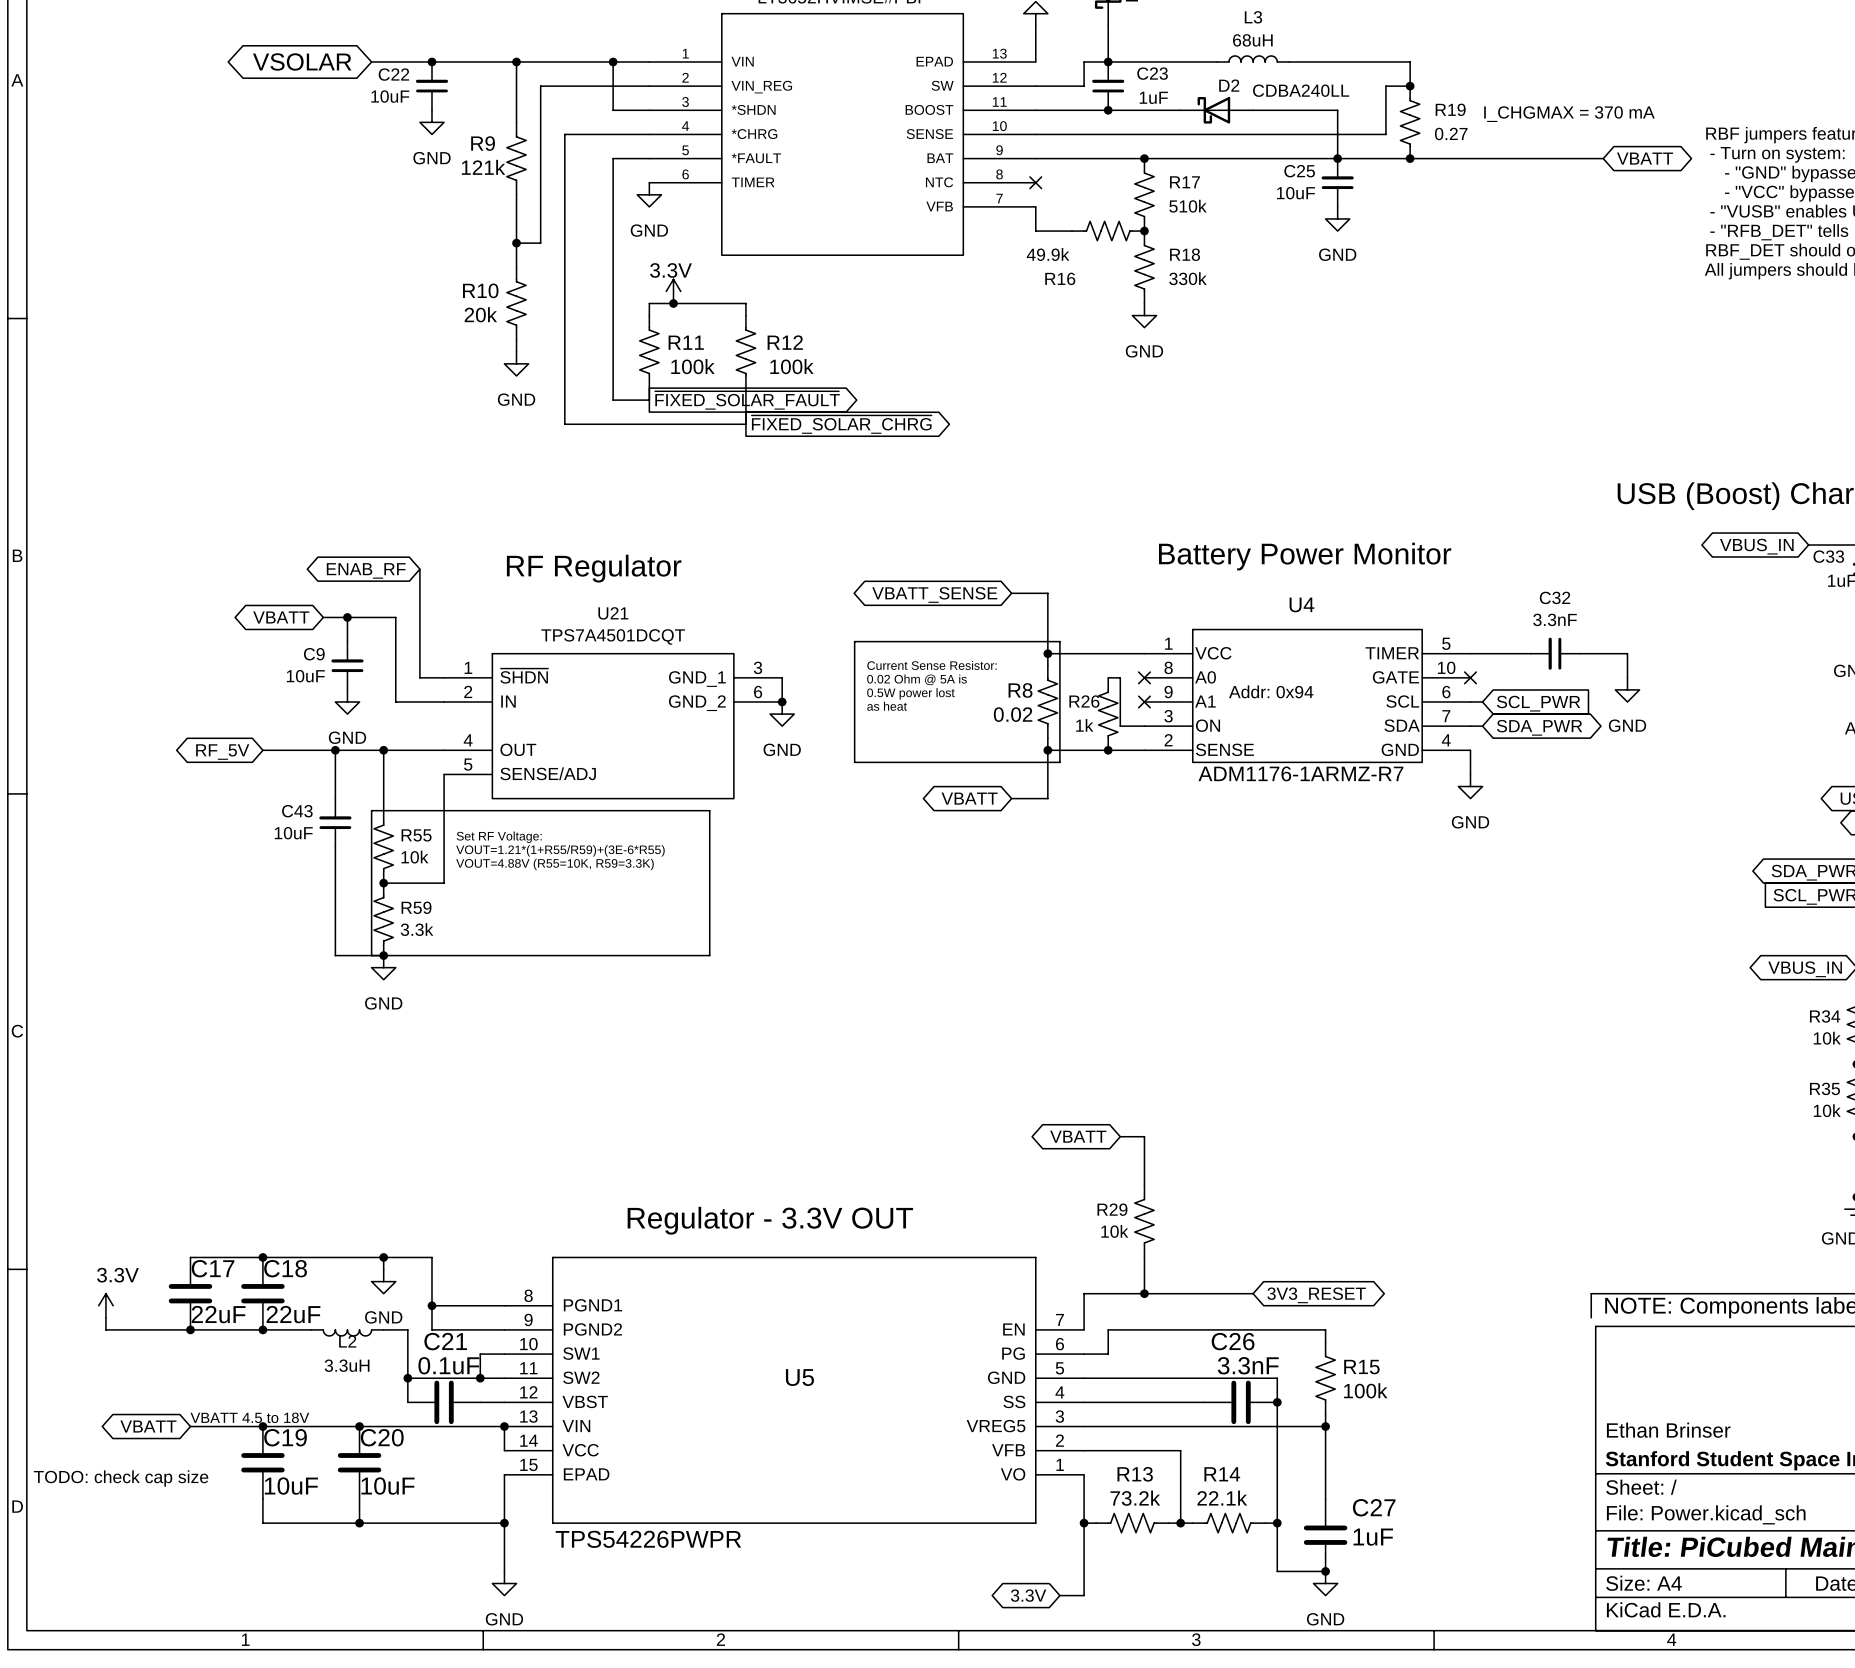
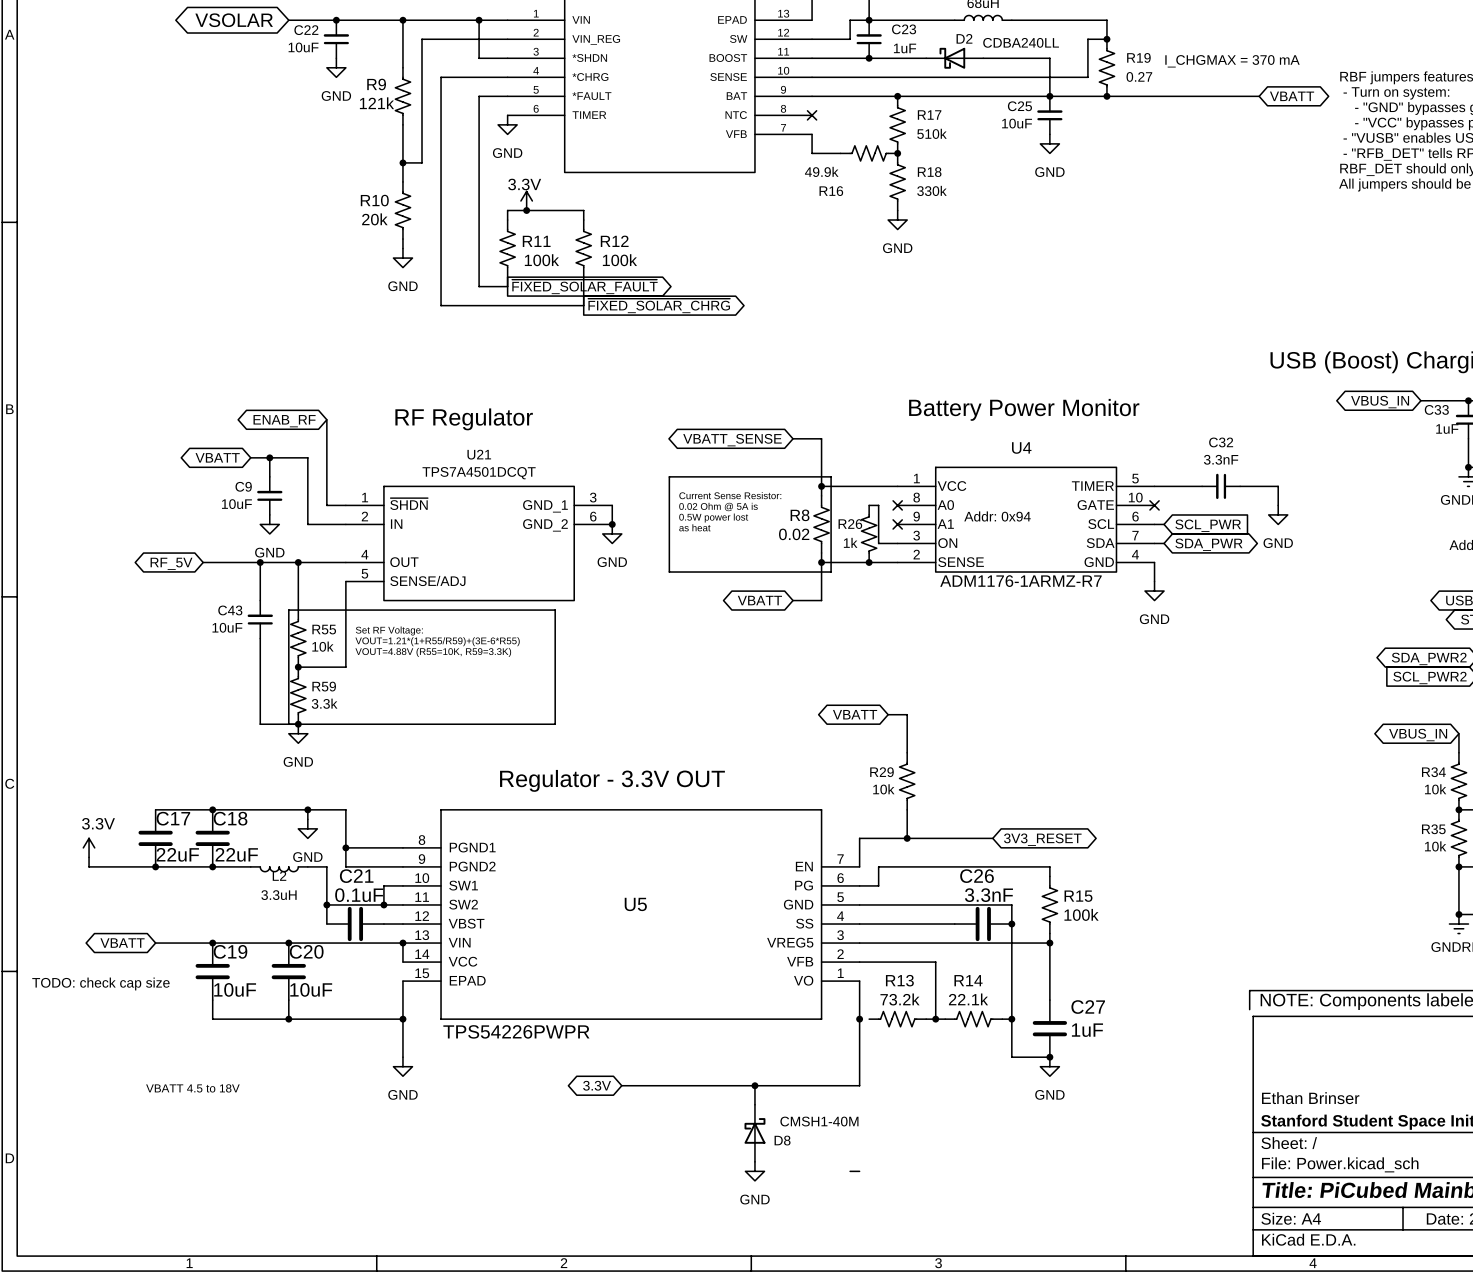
wire: none -> (888, 714) (907, 714) (907, 752)
wire: none -> (155, 809) (345, 809) (345, 866) (402, 866)
junction: none -> (212, 809)
junction: none -> (307, 809)
power symbol: none -> GND (307, 828)
junction: none -> (907, 838)
junction: none -> (345, 847)
wire: none -> (89, 857) (89, 866) (250, 866)
junction: none -> (155, 866)
junction: none -> (212, 866)
wire: none -> (307, 866) (326, 866) (326, 924)
global label position: VBATT (1078, 1136) -> VBATT (855, 714)
wire: none -> (878, 866) (878, 885) (859, 885)
wire: (1144, 1136) (1144, 1185) -> (897, 866) (1049, 866) (1049, 876)
junction: none -> (326, 904)
junction: none -> (383, 904)
junction: none -> (1011, 924)
text position: Regulator - 3.3V OUT (770, 1220) -> Regulator - 3.3V OUT (612, 780)
R29 position: (1144, 1221) -> (907, 781)
junction: none -> (402, 943)
junction: none -> (1049, 943)
wire: (190, 1257) (431, 1257) (431, 1329) -> none
junction position: (262, 1257) -> (212, 943)
wire: (383, 1257) (383, 1269) -> (307, 809) (307, 819)
junction position: (383, 1257) -> (288, 943)
wire: (1144, 1257) (1144, 1293) -> (907, 809) (907, 838)
power symbol: GND (383, 1281) -> none
wire: none -> (859, 981) (859, 1085) (621, 1085)
C17 position: (190, 1293) -> (155, 838)
C18 position: (262, 1293) -> (212, 838)
junction: (1144, 1293) -> none
wire: (1253, 1293) (1084, 1293) (1084, 1329) -> (992, 838) (859, 838) (859, 866)
global label position: 3V3_RESET (1316, 1295) -> 3V3_RESET (1042, 839)
power symbol position: 3.3V (105, 1305) -> 3.3V (89, 847)
wire: (431, 1305) (504, 1305) -> (345, 847) (402, 847)
junction: (431, 1305) -> none
wire: (105, 1317) (105, 1329) (275, 1329) -> (212, 1000) (212, 1019)
junction: (190, 1329) -> none
junction: (262, 1329) -> none
wire: none -> (241, 1019) (298, 1019)
junction: none -> (288, 1019)
wire: (407, 1329) (407, 1402) -> (317, 1019) (336, 1019)
junction: none -> (402, 1019)
junction: none -> (859, 1019)
wire: (1180, 1329) (1108, 1329) (1108, 1354) (1084, 1354) -> none
junction: none -> (935, 1019)
wire: (1289, 1329) (1325, 1329) (1325, 1342) -> none
junction: none -> (1011, 1019)
L2 position: (347, 1332) -> (279, 869)
wire: (504, 1354) (480, 1354) (480, 1378) -> (402, 885) (383, 885) (383, 904)
wire: (407, 1378) (504, 1378) -> (326, 904) (402, 904)
junction: (407, 1378) -> none
junction: (480, 1378) -> none
wire: (1084, 1378) (1277, 1378) (1277, 1571) (1325, 1571) -> (859, 904) (1011, 904) (1011, 1057) (1049, 1057)
R15 position: (1325, 1378) -> (1049, 904)
junction: none -> (1049, 1057)
power symbol: none -> GND (402, 1066)
U5 position: (794, 1390) -> (631, 914)
power symbol: none -> GND (1049, 1066)
C21 position: (444, 1402) -> (355, 924)
wire: (480, 1402) (504, 1402) -> (383, 924) (402, 924)
wire: (1084, 1402) (1204, 1402) -> (859, 924) (954, 924)
C26 position: (1241, 1402) -> (983, 924)
junction: (1277, 1402) -> none
global label: none -> 3.3V (597, 1085)
wire: none -> (754, 1085) (754, 1104)
junction: none -> (754, 1085)
wire: (1325, 1414) (1325, 1498) -> (1049, 933) (1049, 1000)
global label position: VBATT (148, 1426) -> VBATT (122, 943)
wire: (190, 1426) (504, 1426) (504, 1450) -> (155, 943) (402, 943) (402, 962)
junction: (262, 1426) -> none
junction: (359, 1426) -> none
junction: (504, 1426) -> none
wire: (1084, 1426) (1325, 1426) -> (859, 943) (1049, 943)
junction: (1325, 1426) -> none
wire: (1084, 1450) (1180, 1450) (1180, 1523) -> (859, 962) (935, 962) (935, 1019)
C19 position: (262, 1462) -> (212, 971)
C20 position: (359, 1462) -> (288, 971)
wire: (504, 1474) (504, 1571) -> (402, 981) (402, 1057)
D8: none -> CMSH1-40M (754, 1133)
wire: (1084, 1474) (1084, 1595) (1059, 1595) -> none
text position: TODO: check cap size (121, 1478) -> TODO: check cap size (100, 983)
wire: (262, 1498) (262, 1523) (504, 1523) -> none
wire: (359, 1498) (359, 1523) -> (288, 1000) (288, 1019)
junction: (359, 1523) -> none
junction: (504, 1523) -> none
power symbol: none -> GND (754, 1171)
junction: (1084, 1523) -> none
R13 position: (1132, 1523) -> (897, 1019)
wire: (1168, 1523) (1192, 1523) -> none
junction: (1180, 1523) -> none
R14 position: (1228, 1523) -> (973, 1019)
wire: (1265, 1523) (1277, 1523) -> none
junction: (1277, 1523) -> none
C27 position: (1325, 1535) -> (1049, 1028)
junction: (1325, 1571) -> none
power symbol: GND (504, 1583) -> none
power symbol: GND (1325, 1583) -> none
global label: 3.3V (1028, 1595) -> none

